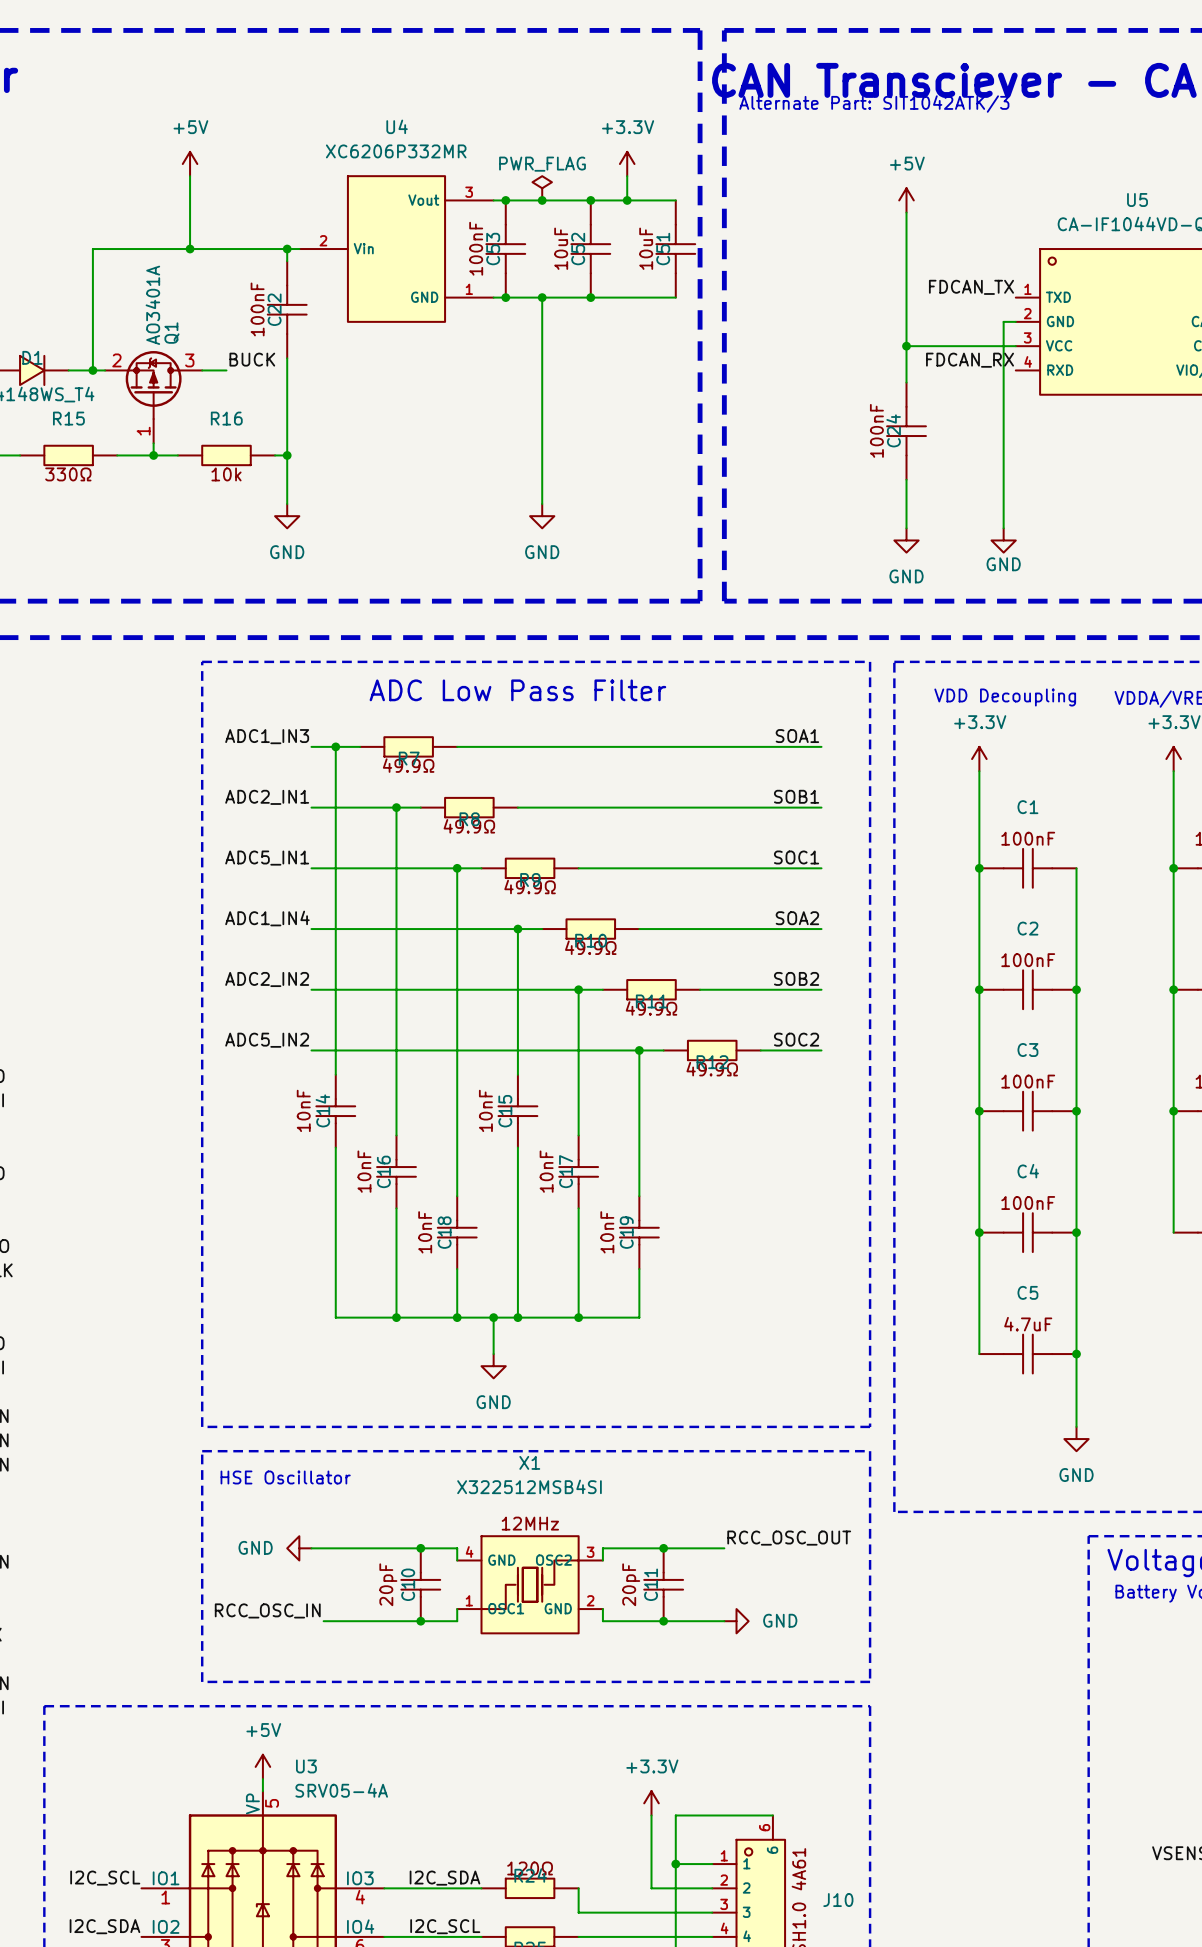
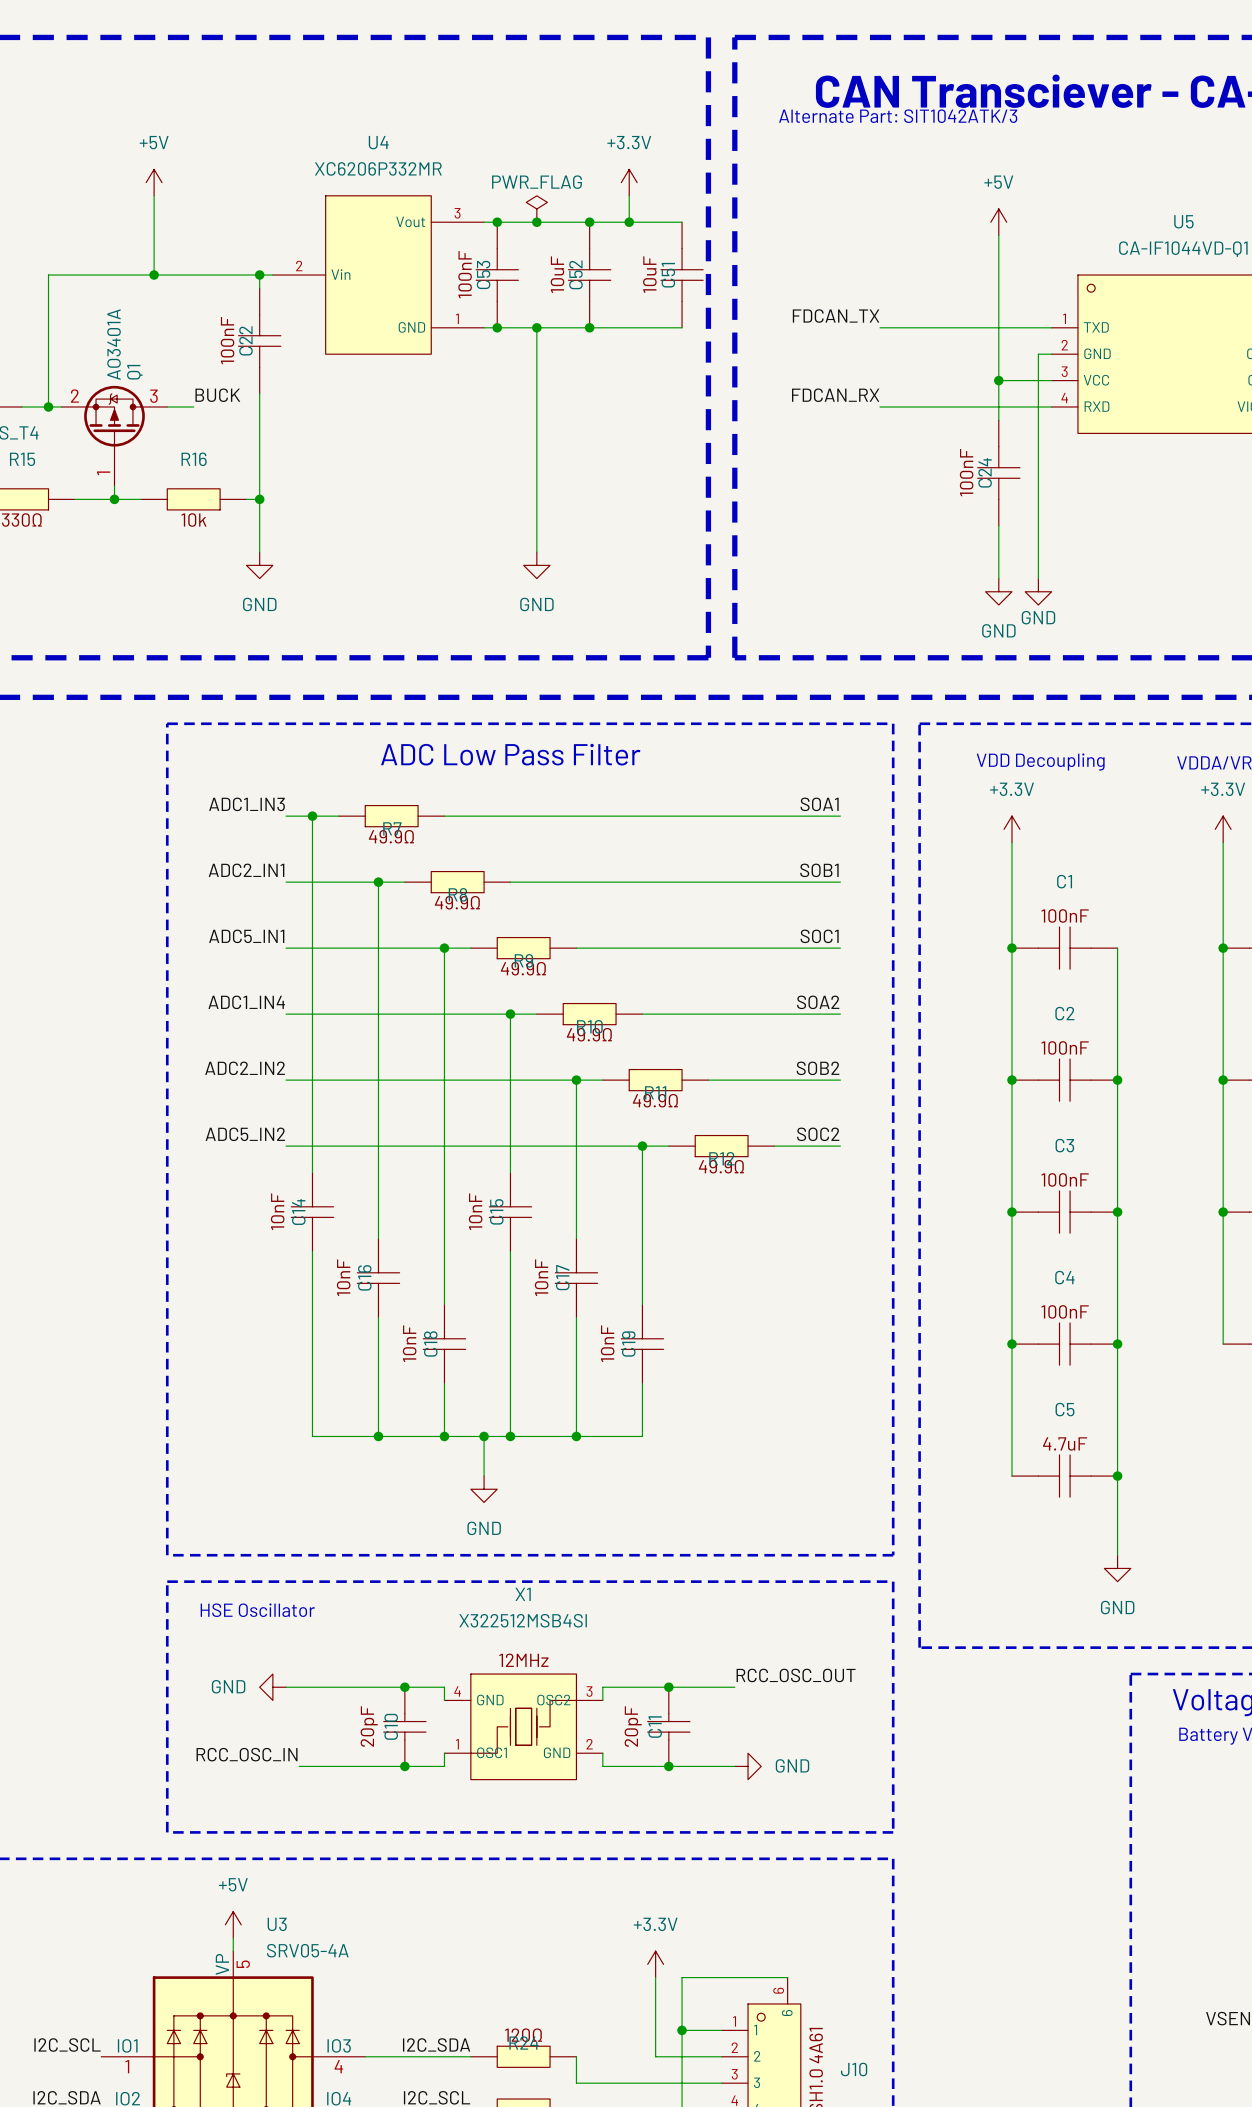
power symbol position: +5V (906, 200) -> +5V (998, 222)
wire: (906, 212) (906, 382) -> (998, 235) (998, 420)
label position: FDCAN_TX (971, 287) -> FDCAN_TX (836, 316)
wire: none -> (880, 327) (1051, 327)
wire: (906, 346) (967, 346) -> none
junction: (906, 346) -> none
junction: none -> (998, 380)
label position: FDCAN_RX (970, 360) -> FDCAN_RX (835, 395)
wire: none -> (880, 406) (1051, 406)
C24 position: (906, 431) -> (998, 472)
wire: (906, 479) (906, 528) -> (998, 525) (998, 578)
power symbol position: GND (906, 540) -> GND (998, 591)

